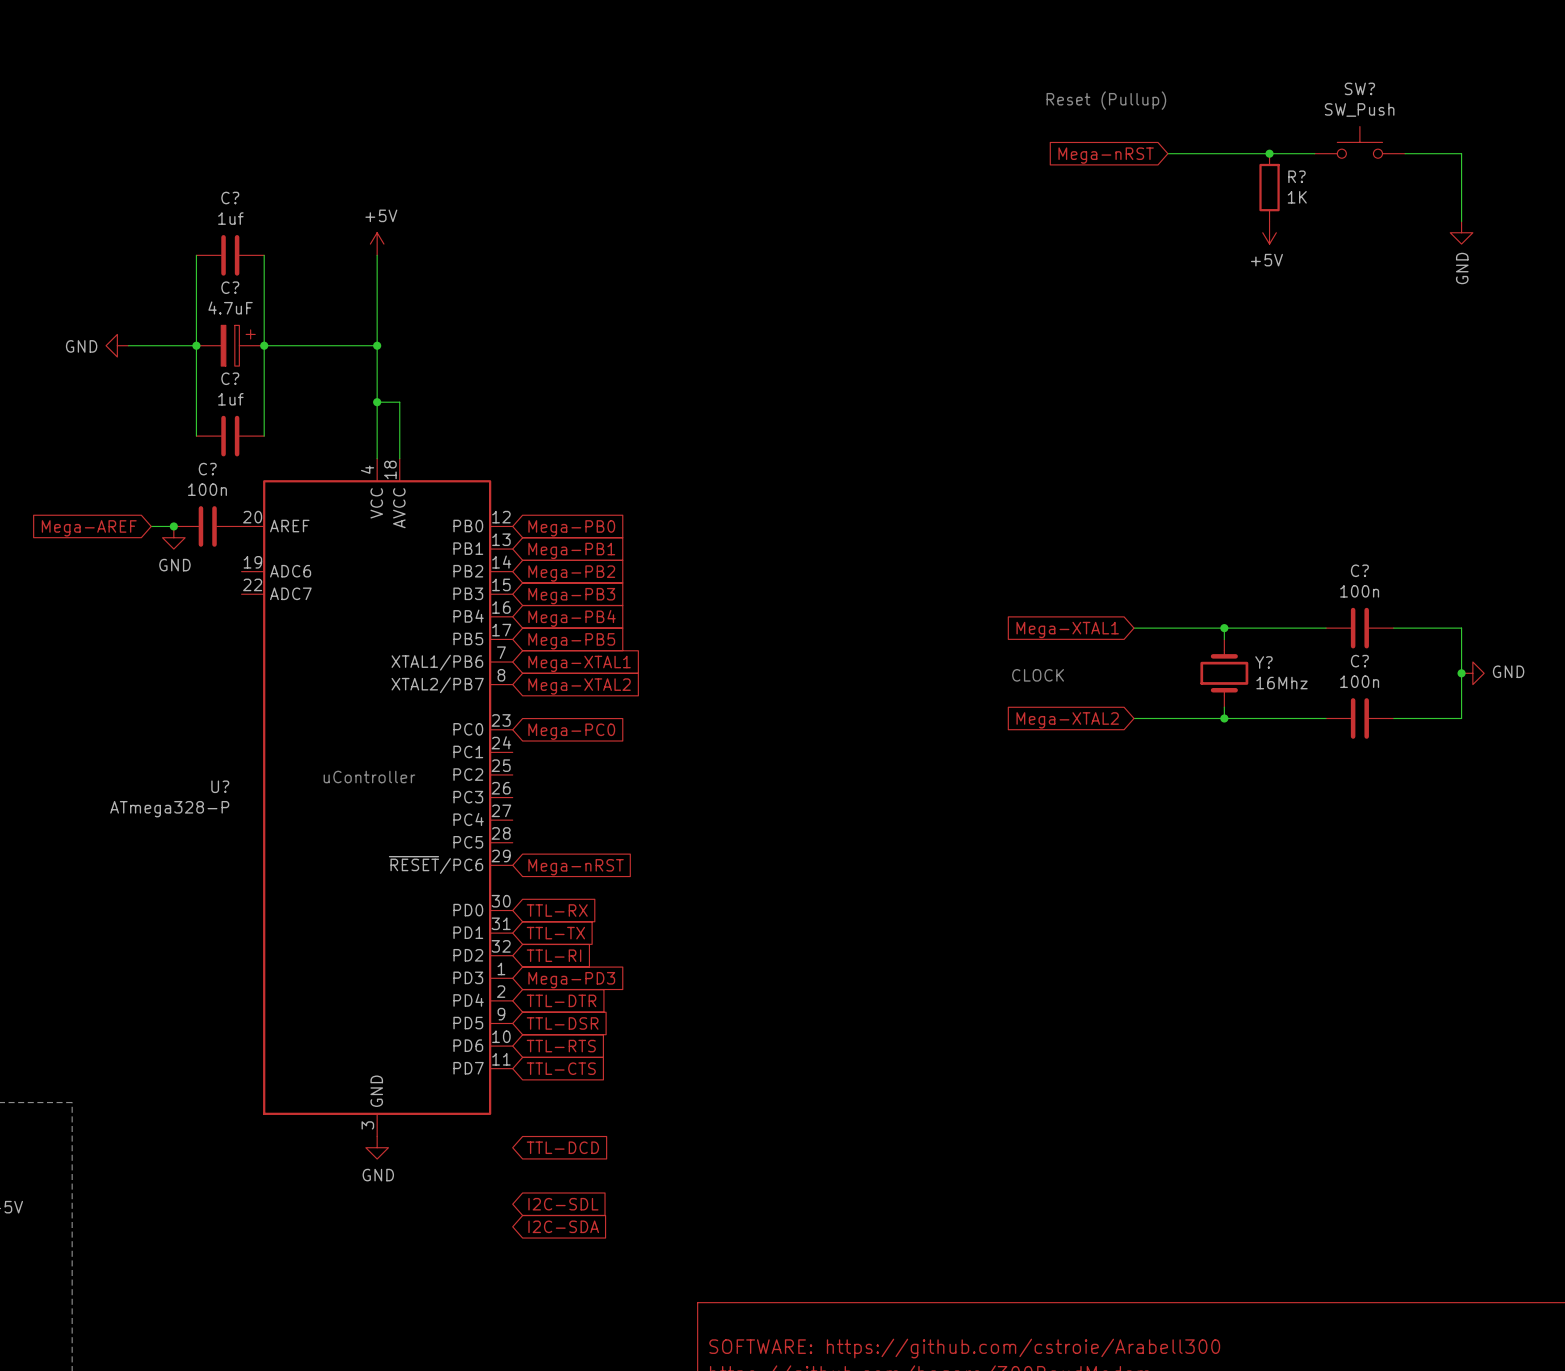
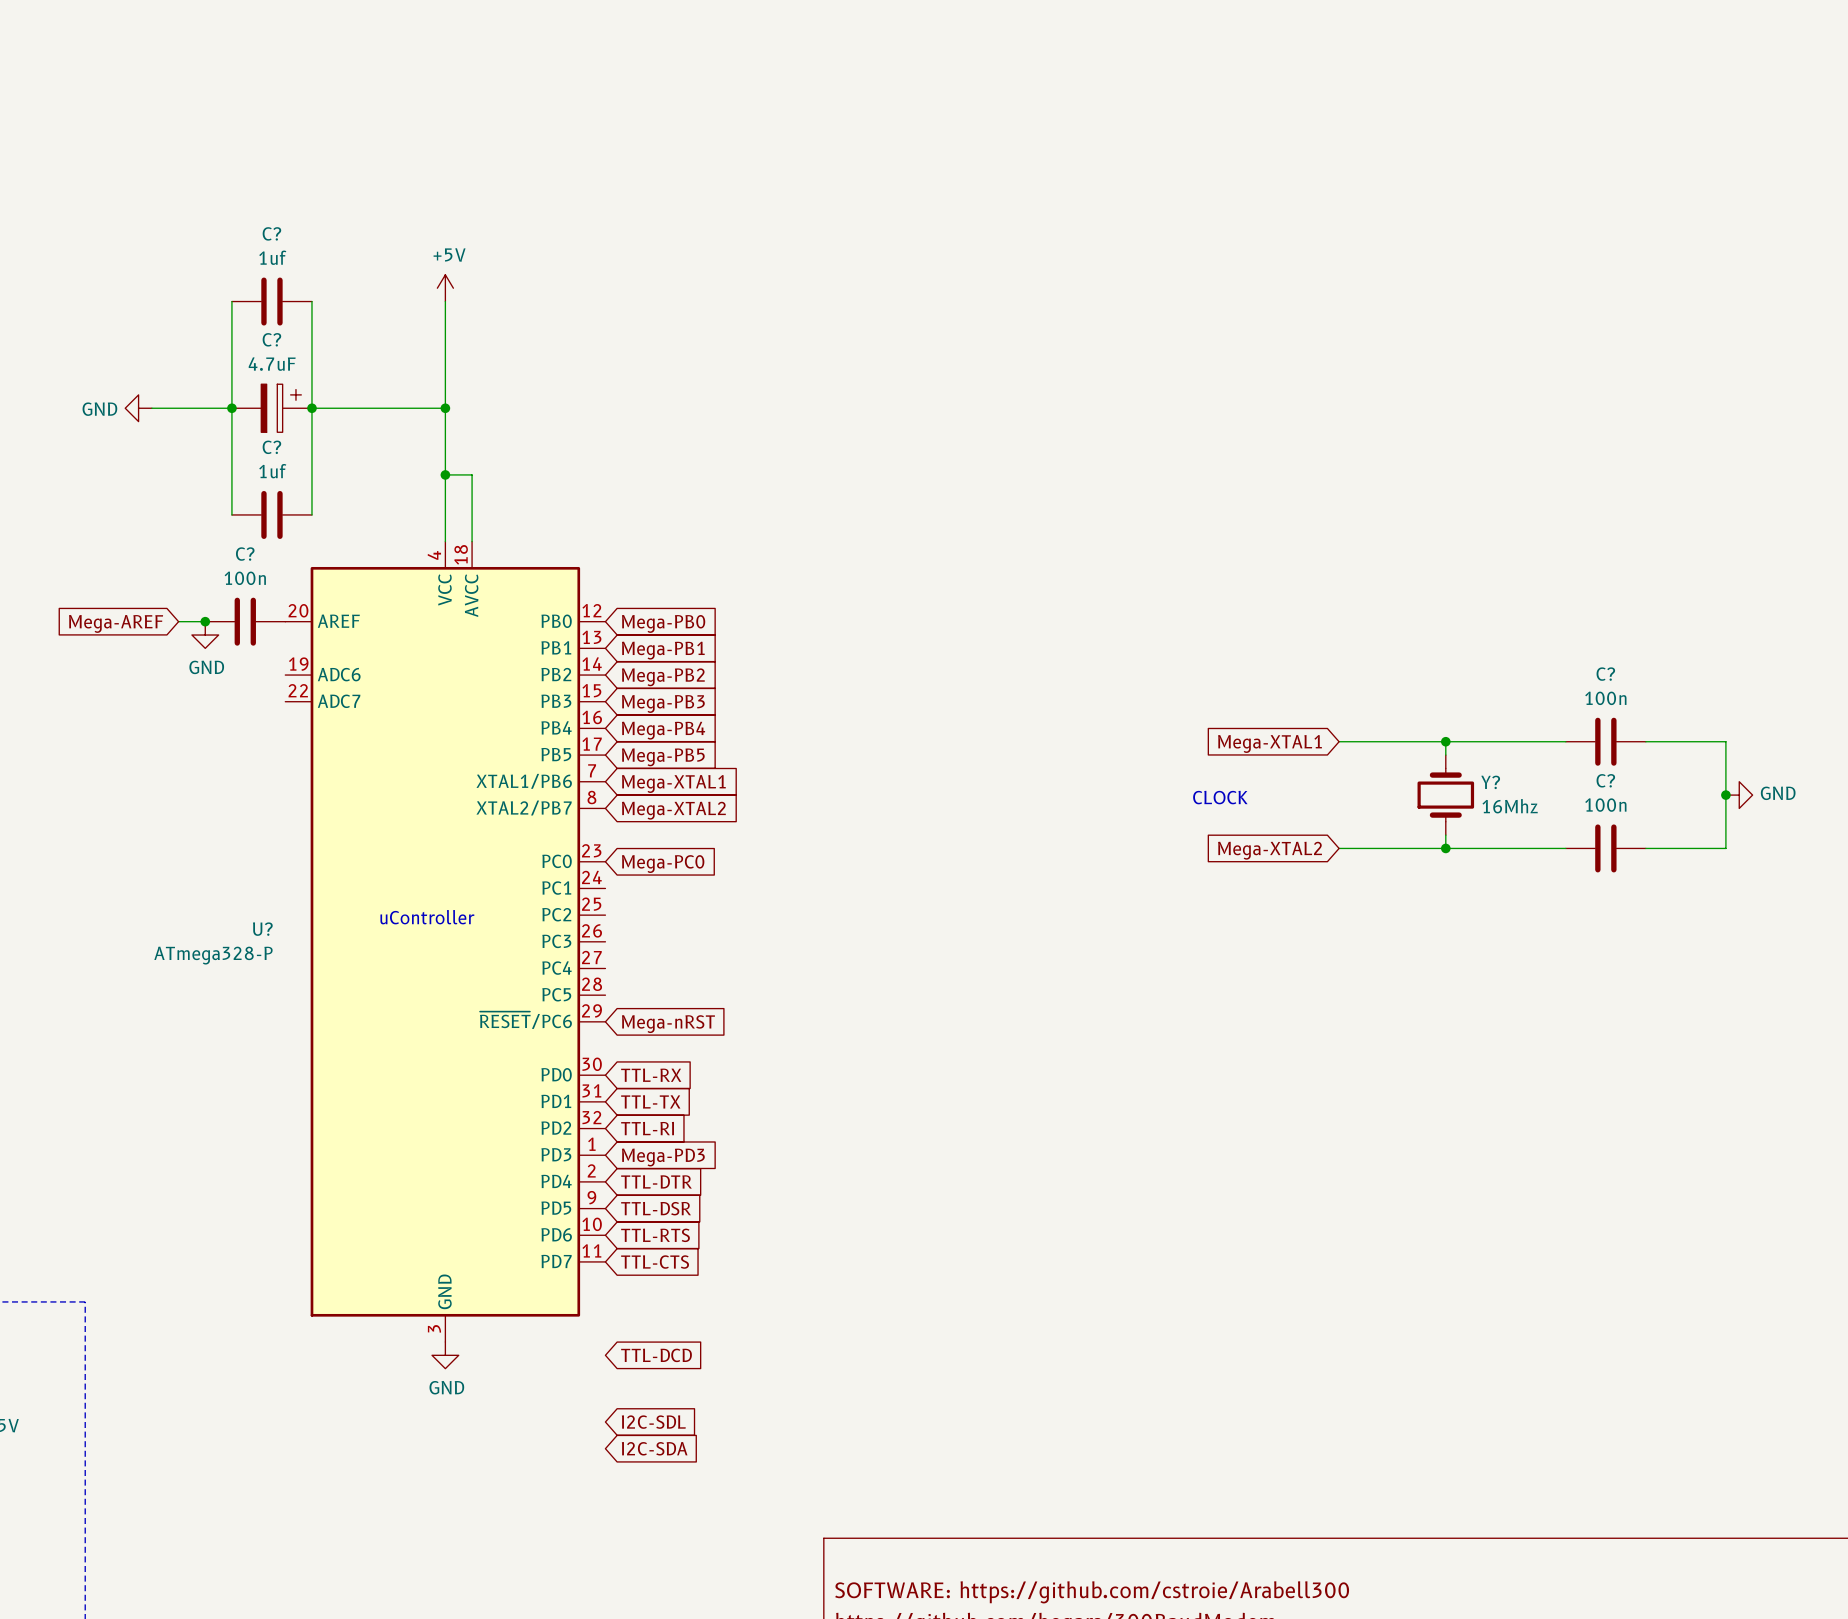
text: Reset (Pullup) (1106, 100) -> none
SW?: SW_Push (1359, 142) -> none
wire: (1167, 153) (1314, 153) -> none
junction: (1269, 153) -> none
wire: (1405, 153) (1461, 153) (1461, 221) -> none
global label: Mega-nRST (1106, 155) -> none
R?: 1K (1269, 187) -> none
power symbol: +5V (1269, 232) -> none
power symbol: GND (1461, 232) -> none

